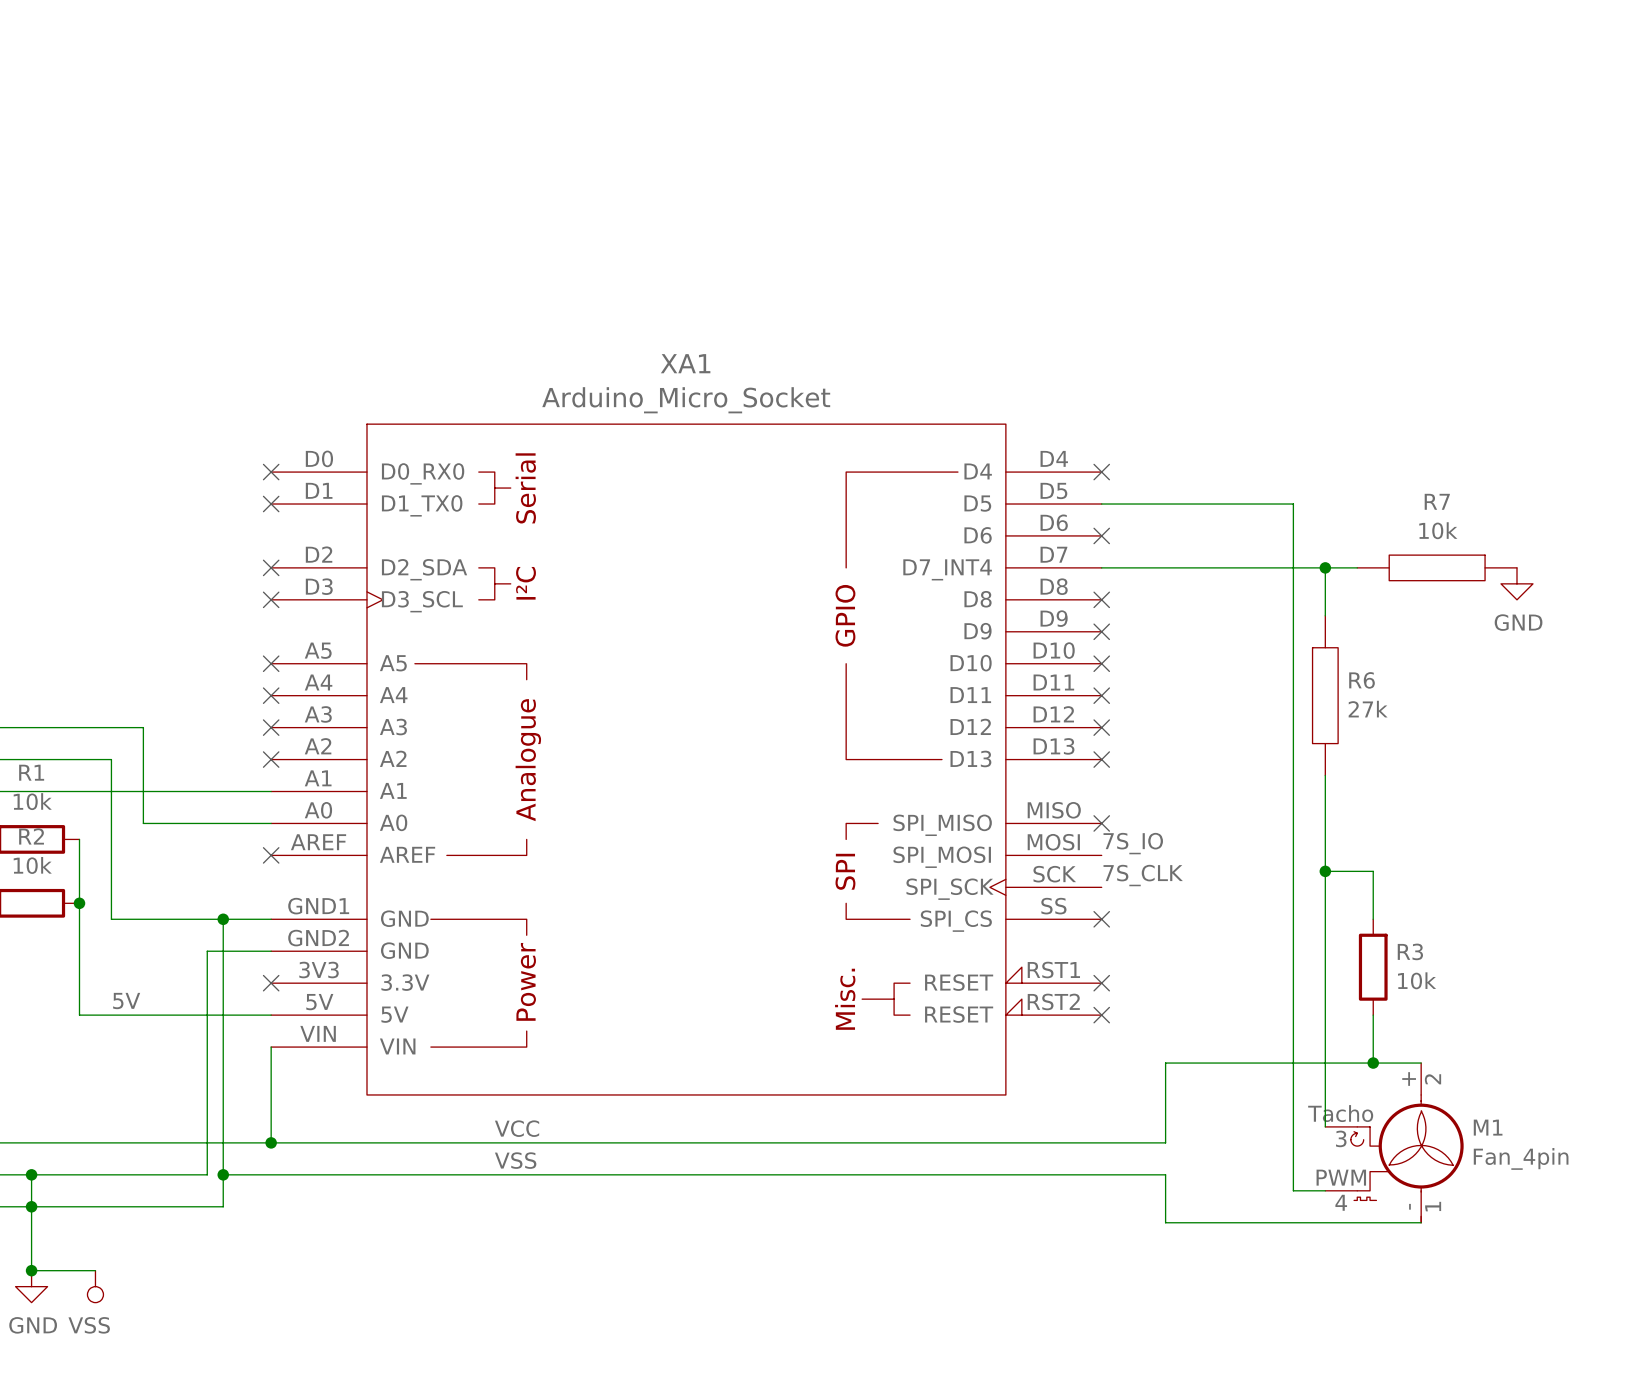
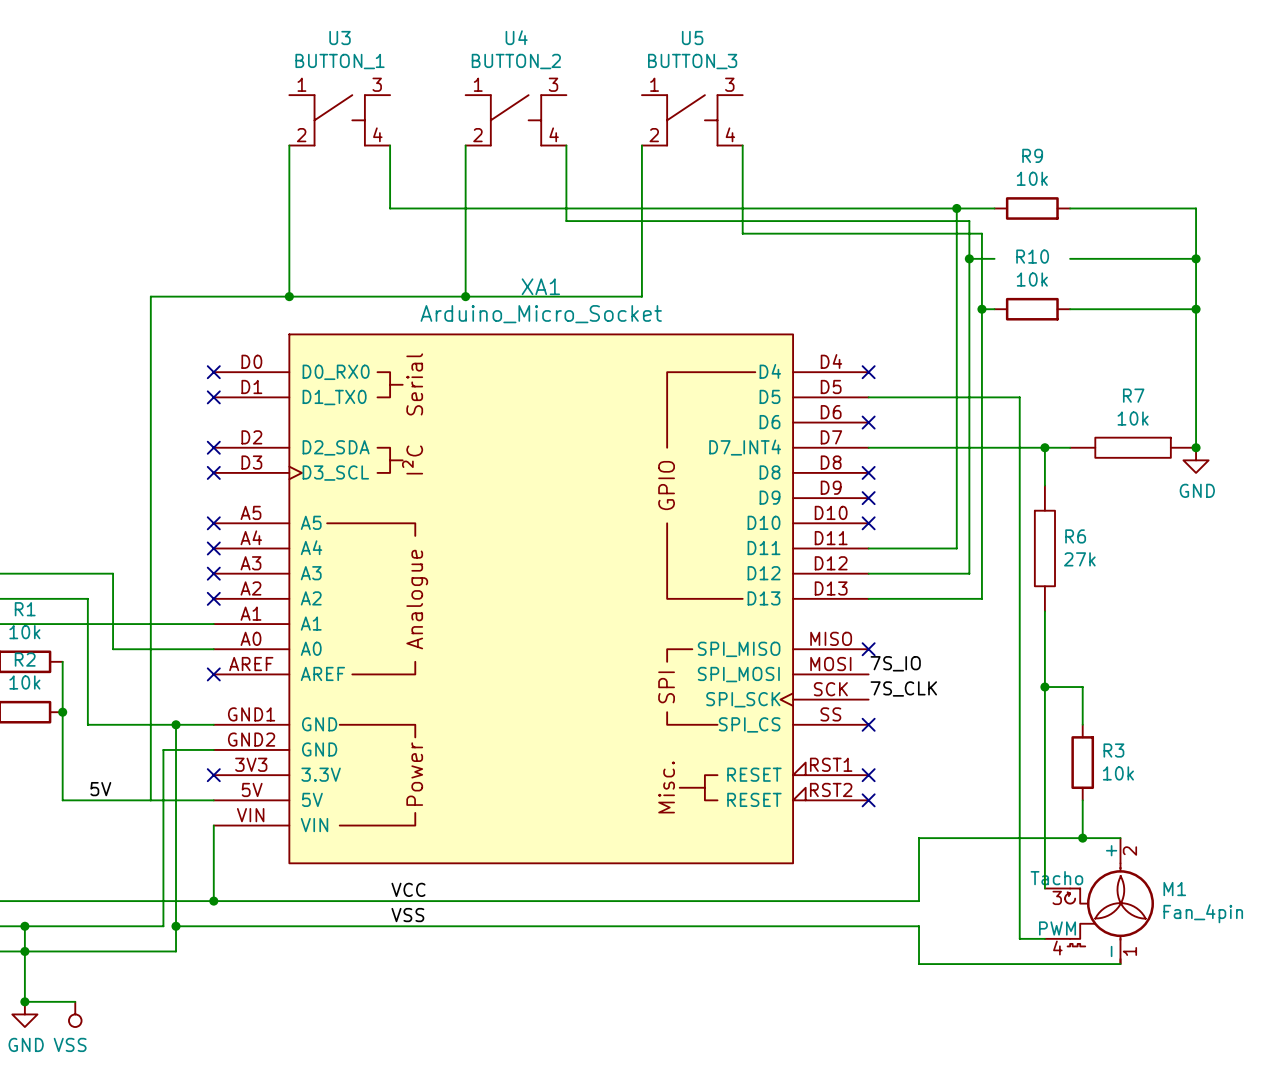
U3: none -> BUTTON_1 (339, 120)
U4: none -> BUTTON_2 (516, 120)
U5: none -> BUTTON_3 (692, 120)
wire: none -> (289, 145) (289, 296)
wire: none -> (390, 145) (390, 208) (994, 208)
wire: none -> (465, 145) (465, 296)
wire: none -> (566, 145) (566, 221) (969, 221) (969, 573) (868, 573)
wire: none -> (641, 145) (641, 296) (150, 296) (150, 800)
wire: none -> (742, 145) (742, 233) (981, 233) (981, 598) (868, 598)
wire: none -> (956, 208) (956, 548) (868, 548)
junction: none -> (956, 208)
R9: none -> 10k (1032, 208)
wire: none -> (1070, 208) (1196, 208) (1196, 447)
wire: none -> (969, 258) (994, 258)
junction: none -> (969, 258)
wire: none -> (1070, 258) (1196, 258)
junction: none -> (1196, 258)
junction: none -> (289, 296)
junction: none -> (465, 296)
wire: none -> (981, 309) (994, 309)
junction: none -> (981, 309)
R10: none -> 10k (1032, 309)
wire: none -> (1070, 309) (1196, 309)
junction: none -> (1196, 309)
junction: none -> (1196, 447)
no-connect mark: (1101, 695) -> none
no-connect mark: (1101, 727) -> none
no-connect mark: (1101, 759) -> none

